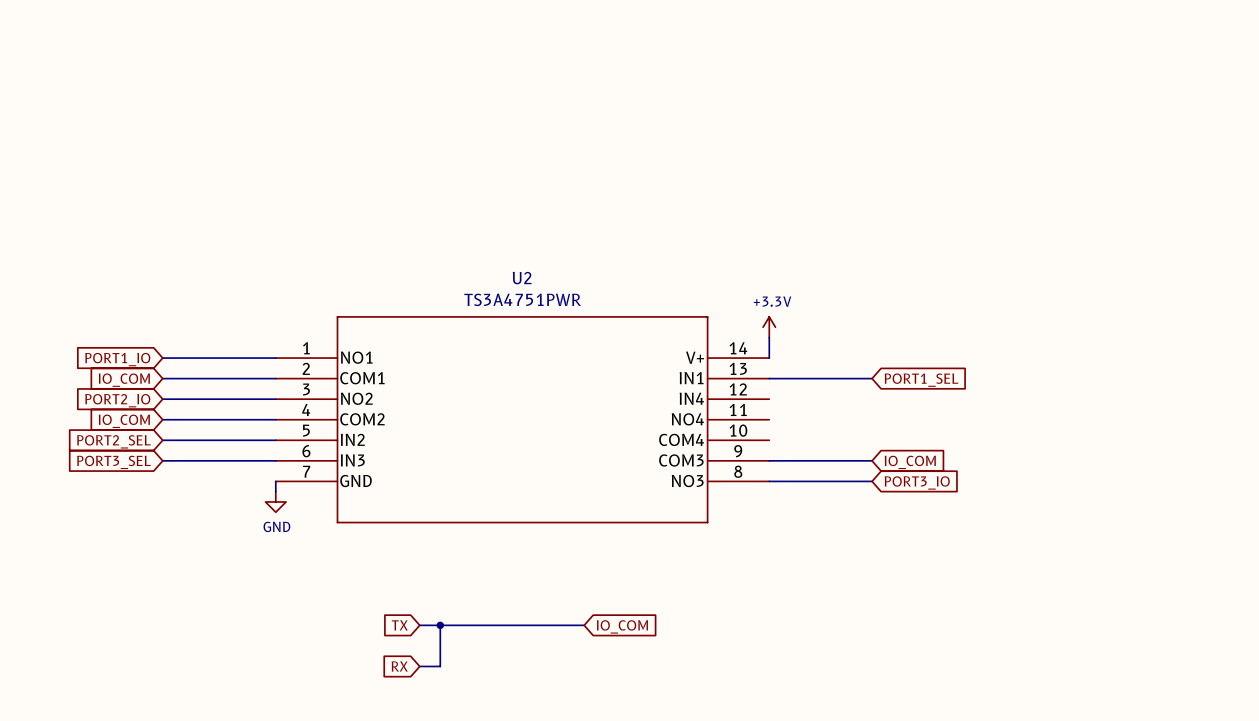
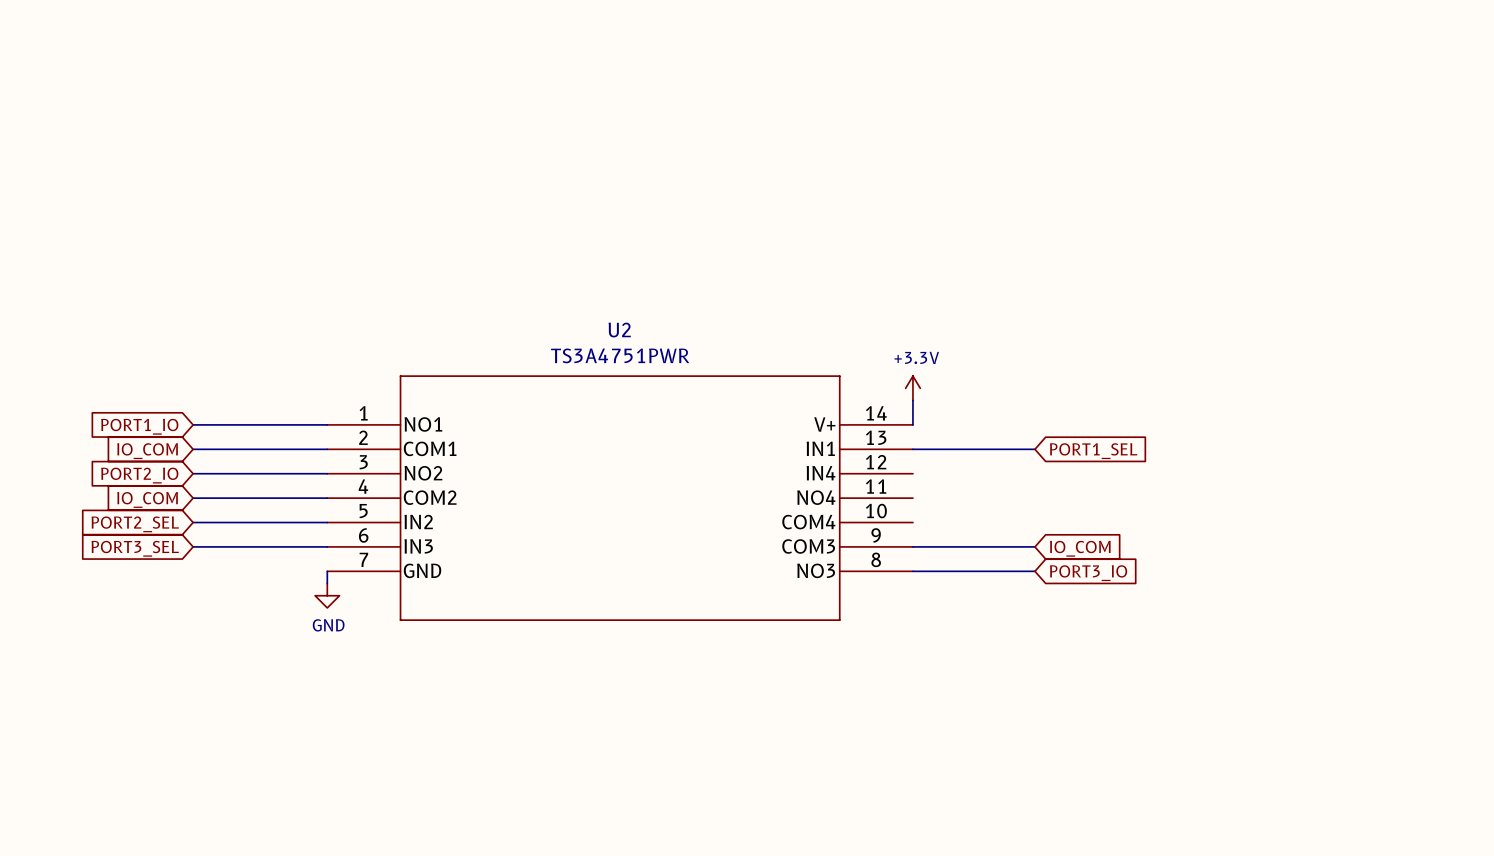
global label: TX (399, 625) -> none
wire: (419, 625) (584, 625) -> none
wire: (440, 625) (440, 666) (419, 666) -> none
junction: (440, 625) -> none
global label: IO_COM (622, 626) -> none
global label: RX (399, 666) -> none

